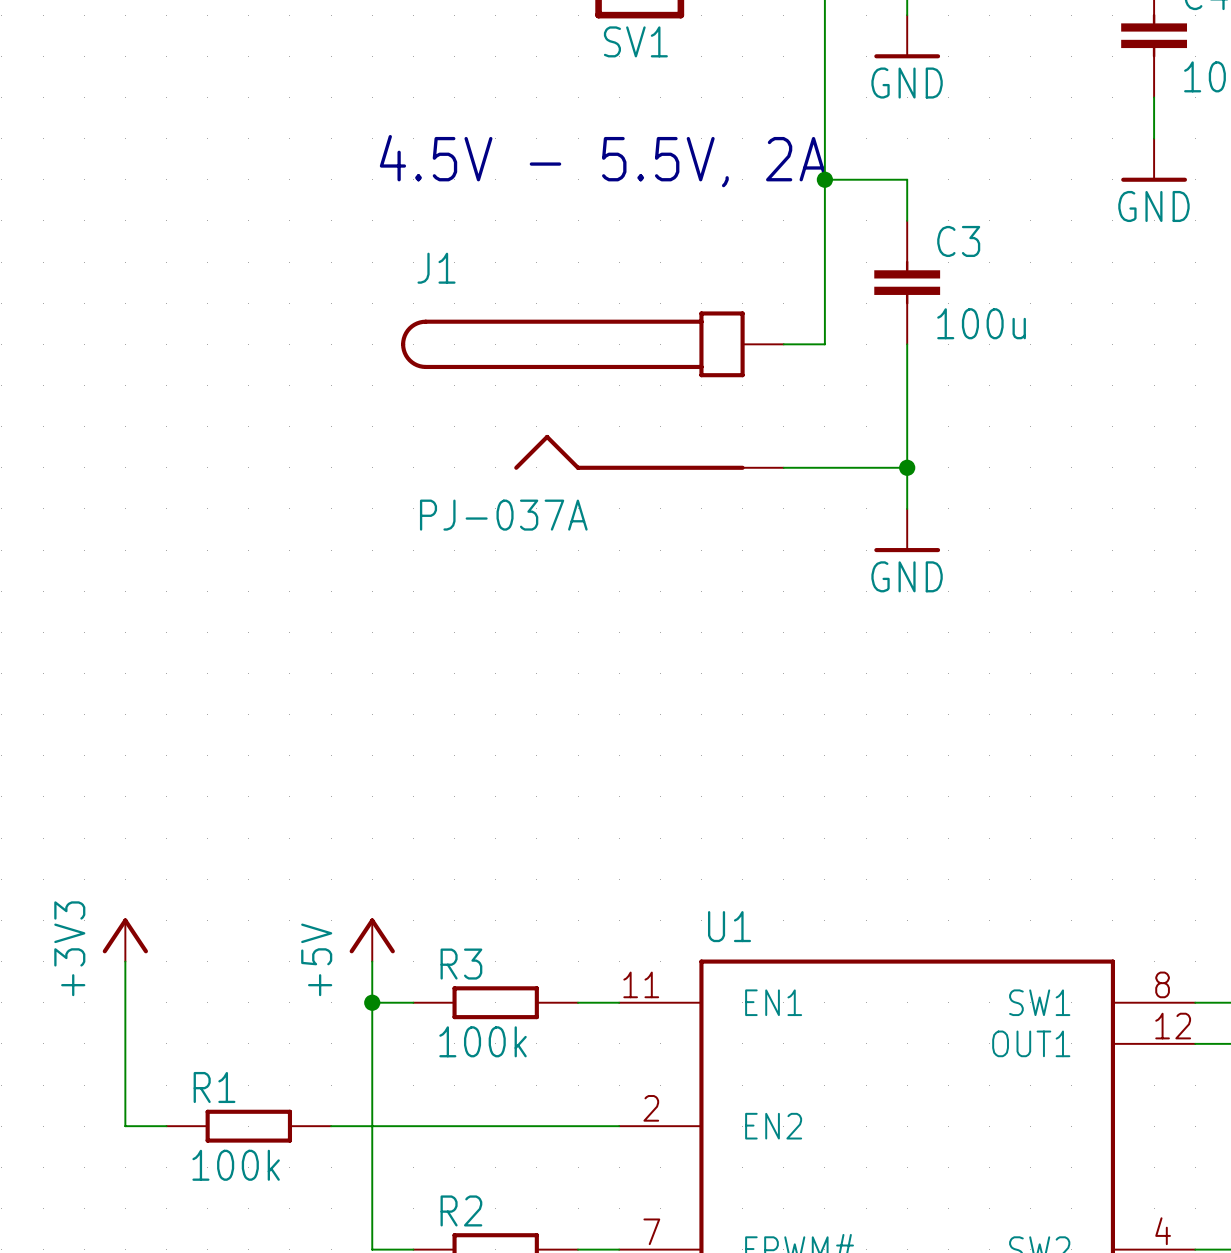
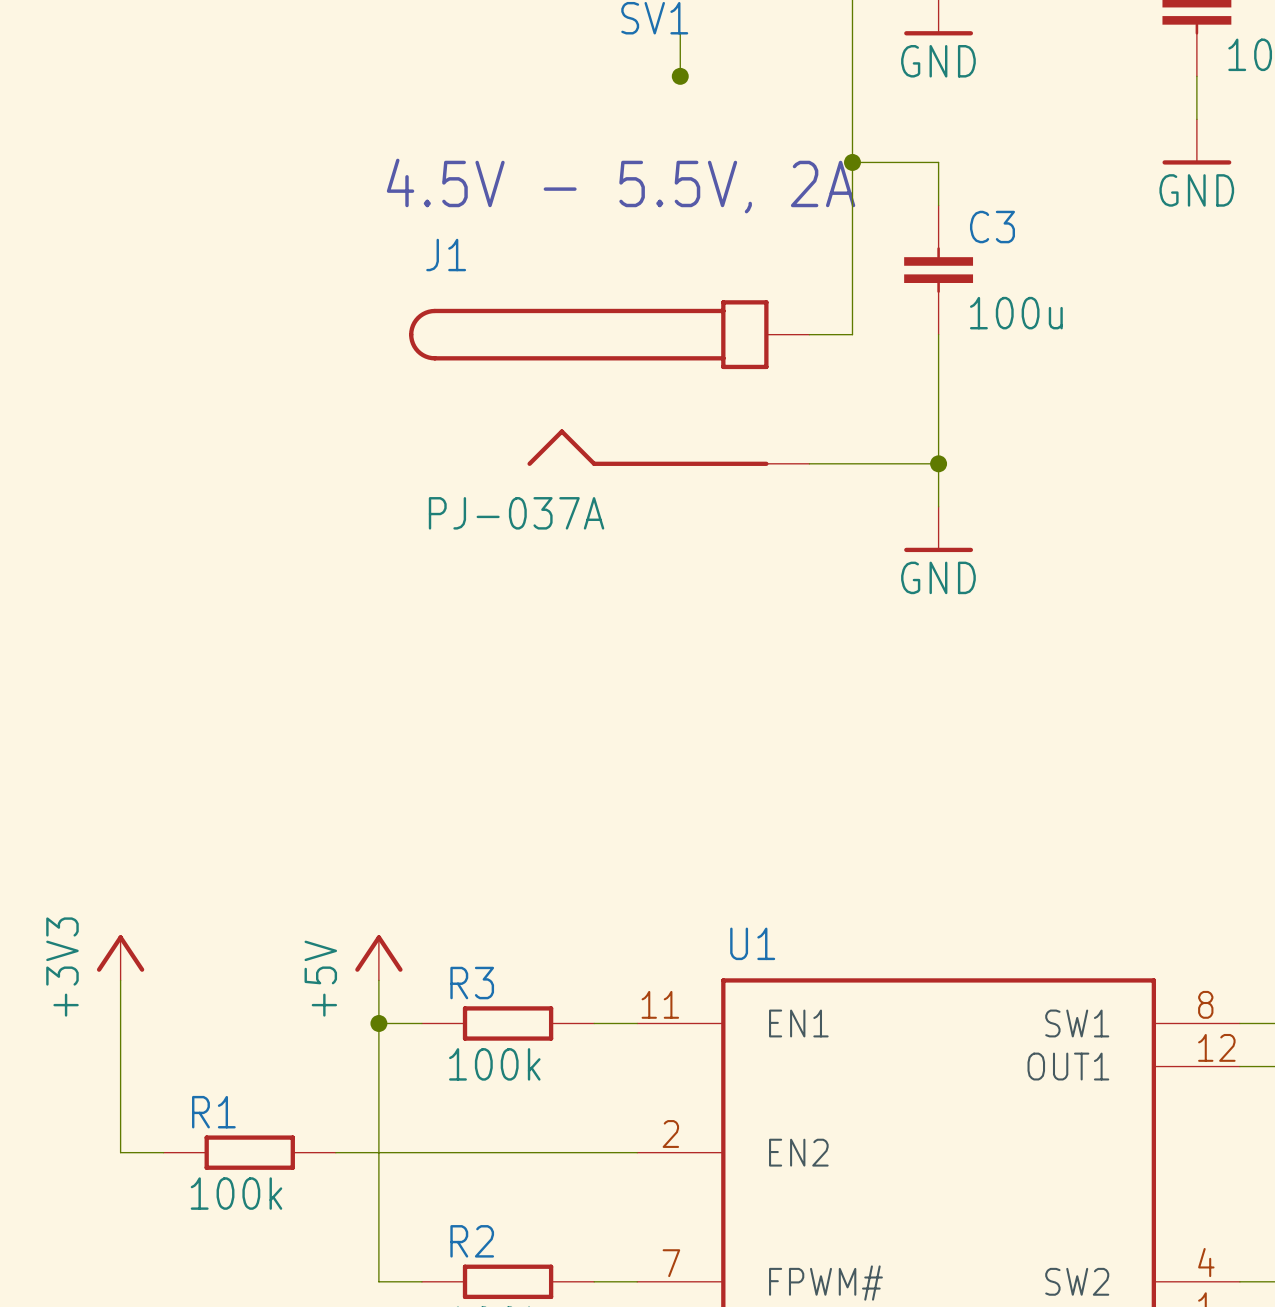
wire: none -> (680, 33) (680, 76)
junction: none -> (680, 76)
text position: 4.5V - 5.5V, 2A (603, 161) -> 4.5V - 5.5V, 2A (621, 186)

